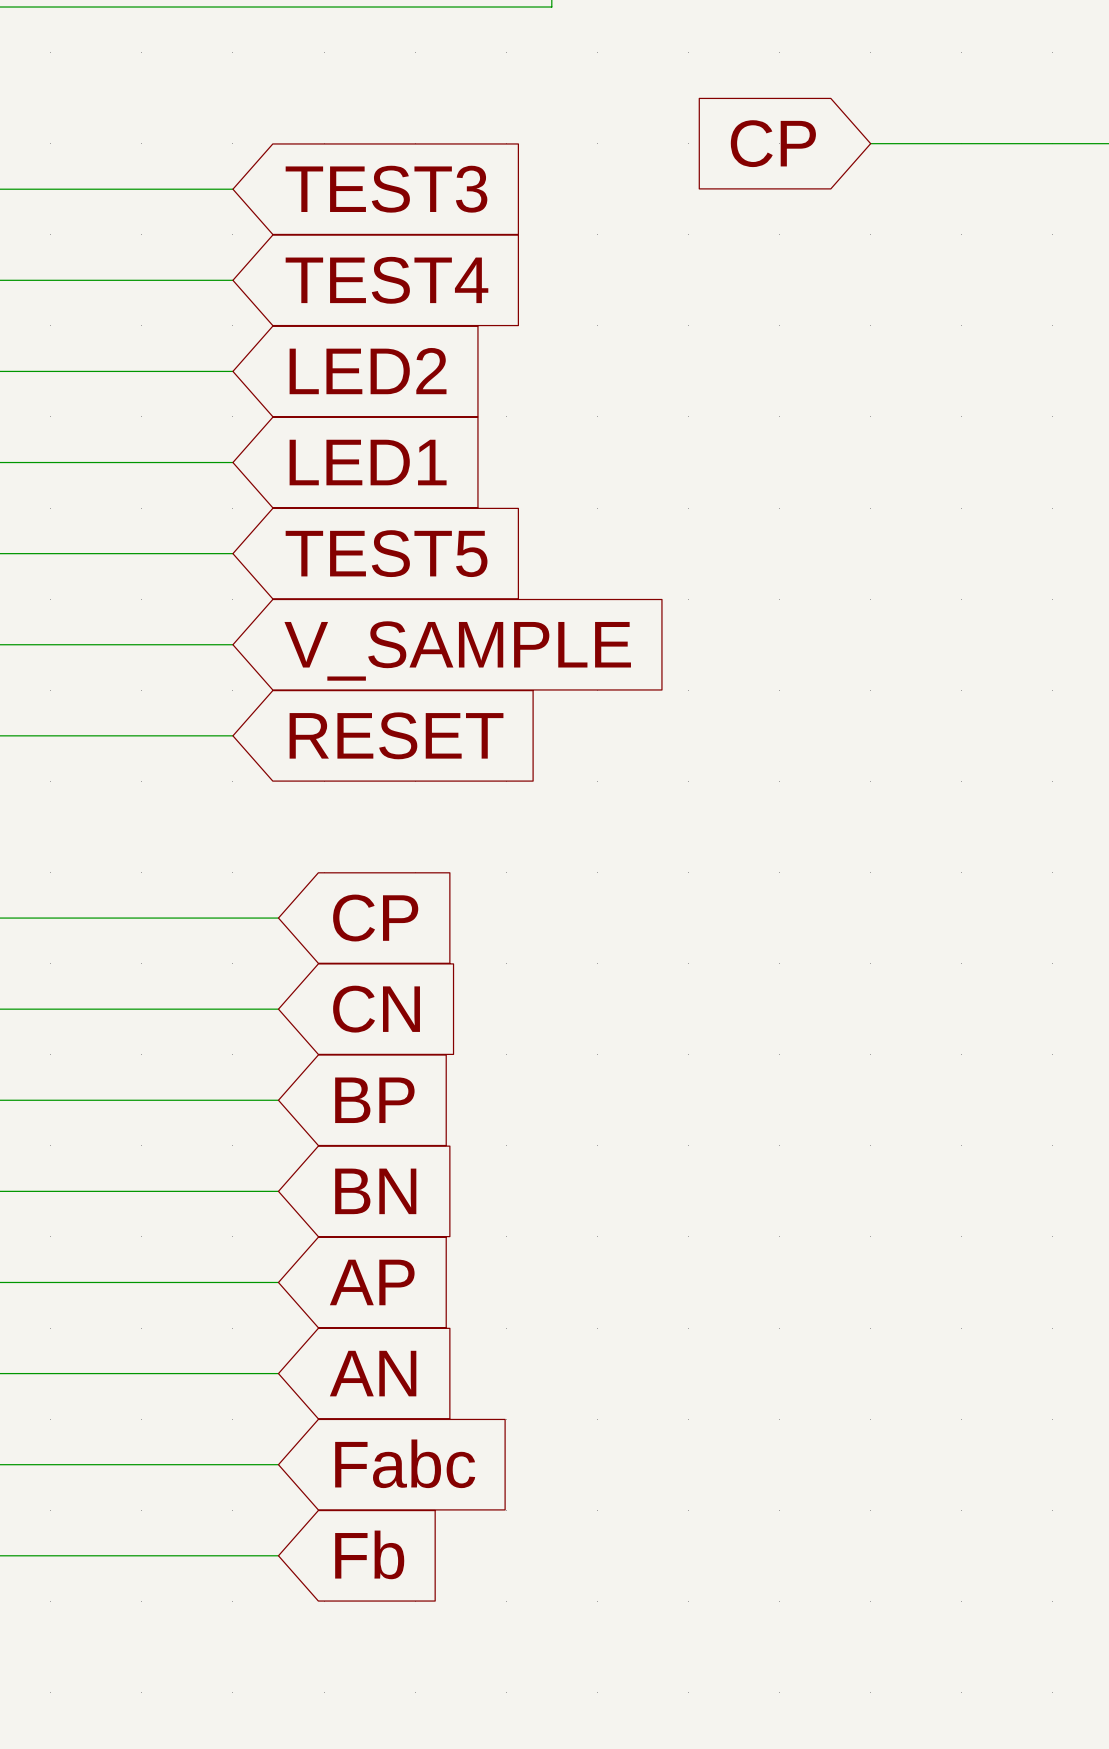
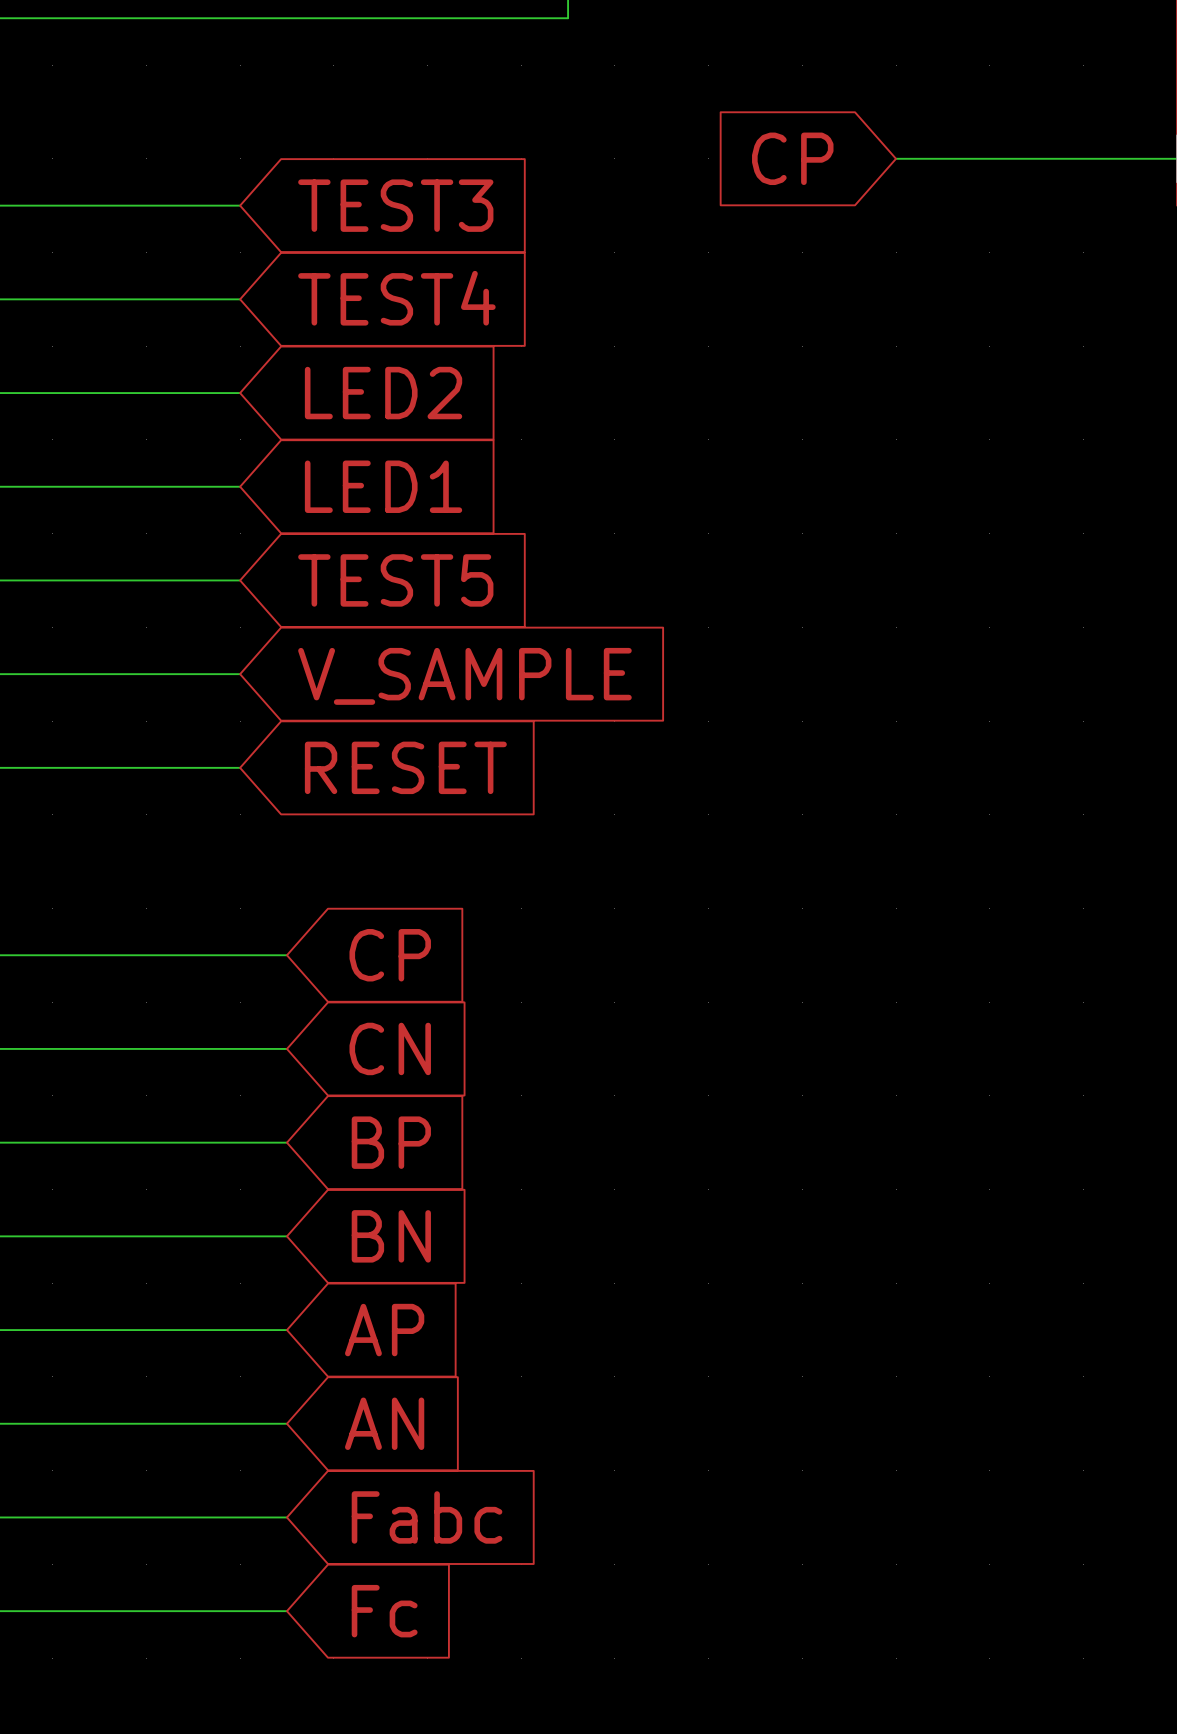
global label: Fb (369, 1554) -> Fc (384, 1611)

